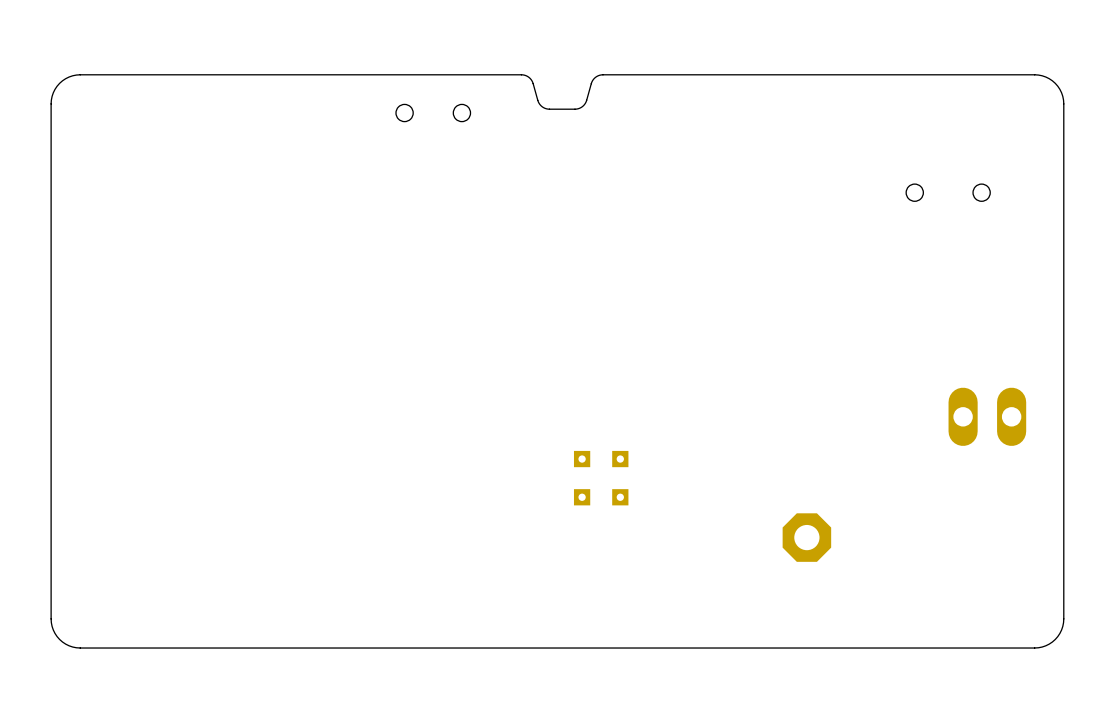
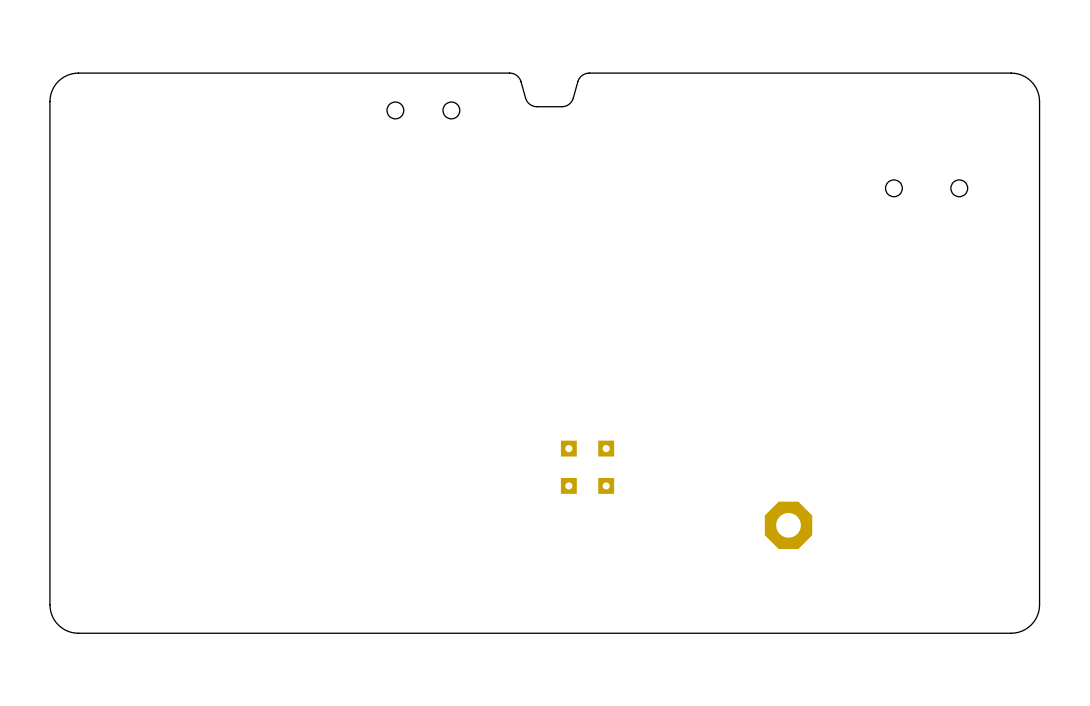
part: (987, 416) -> none

